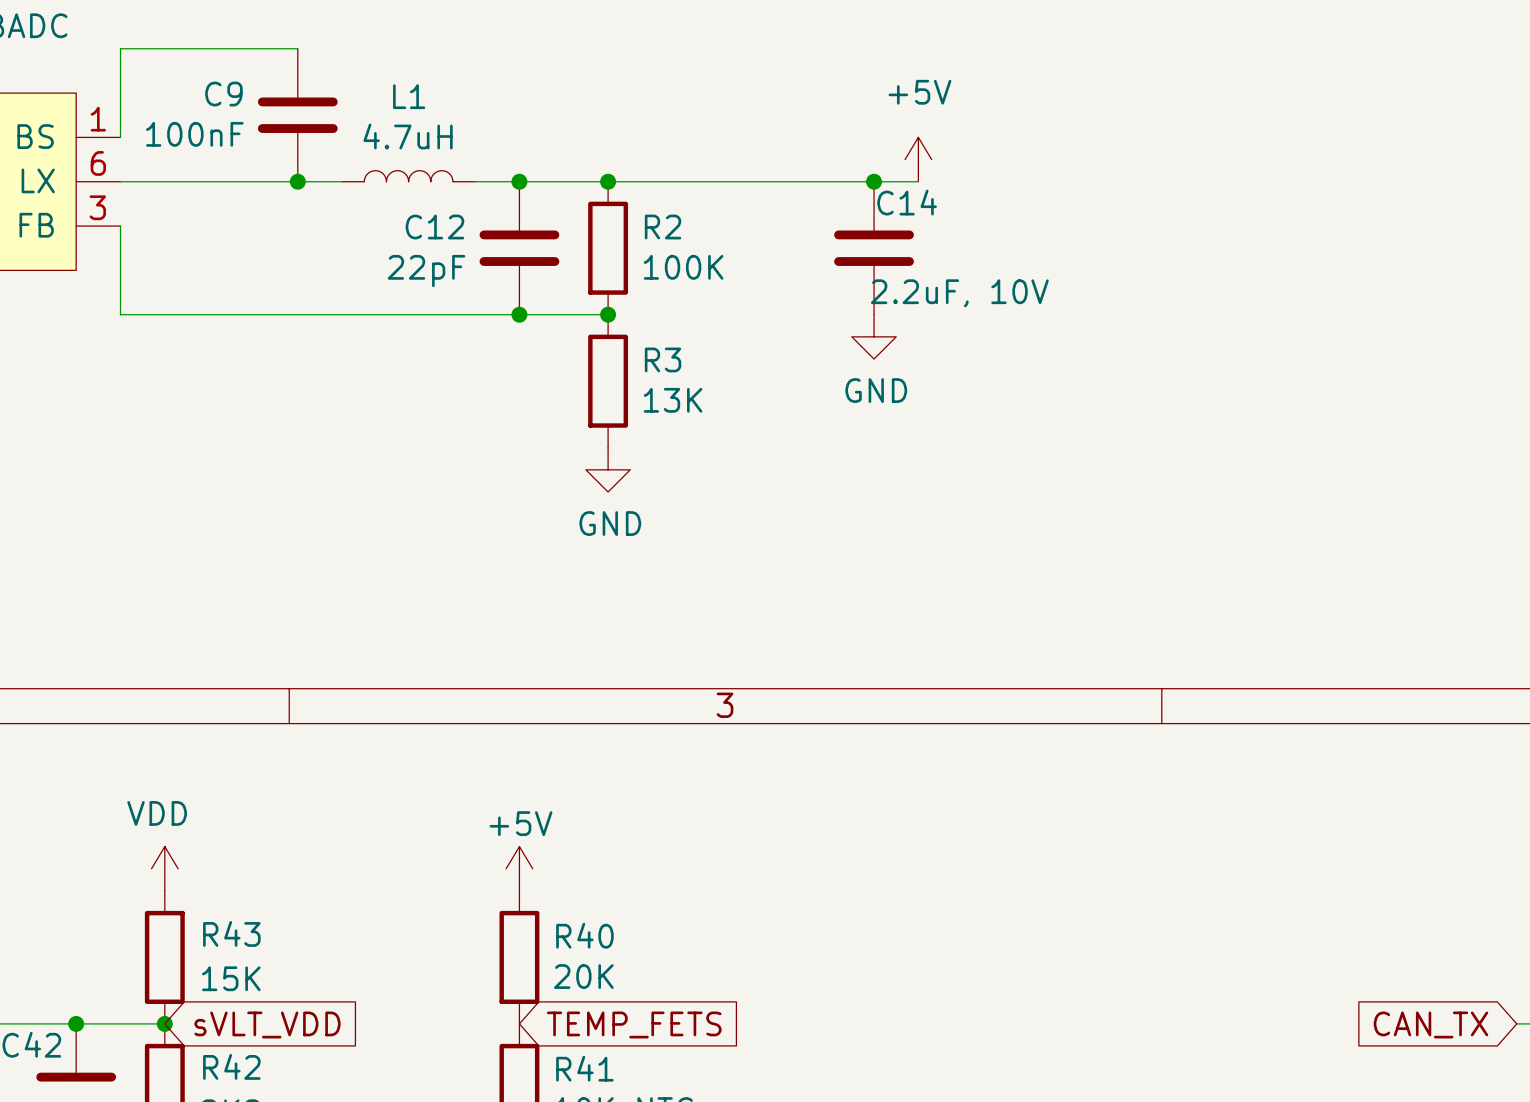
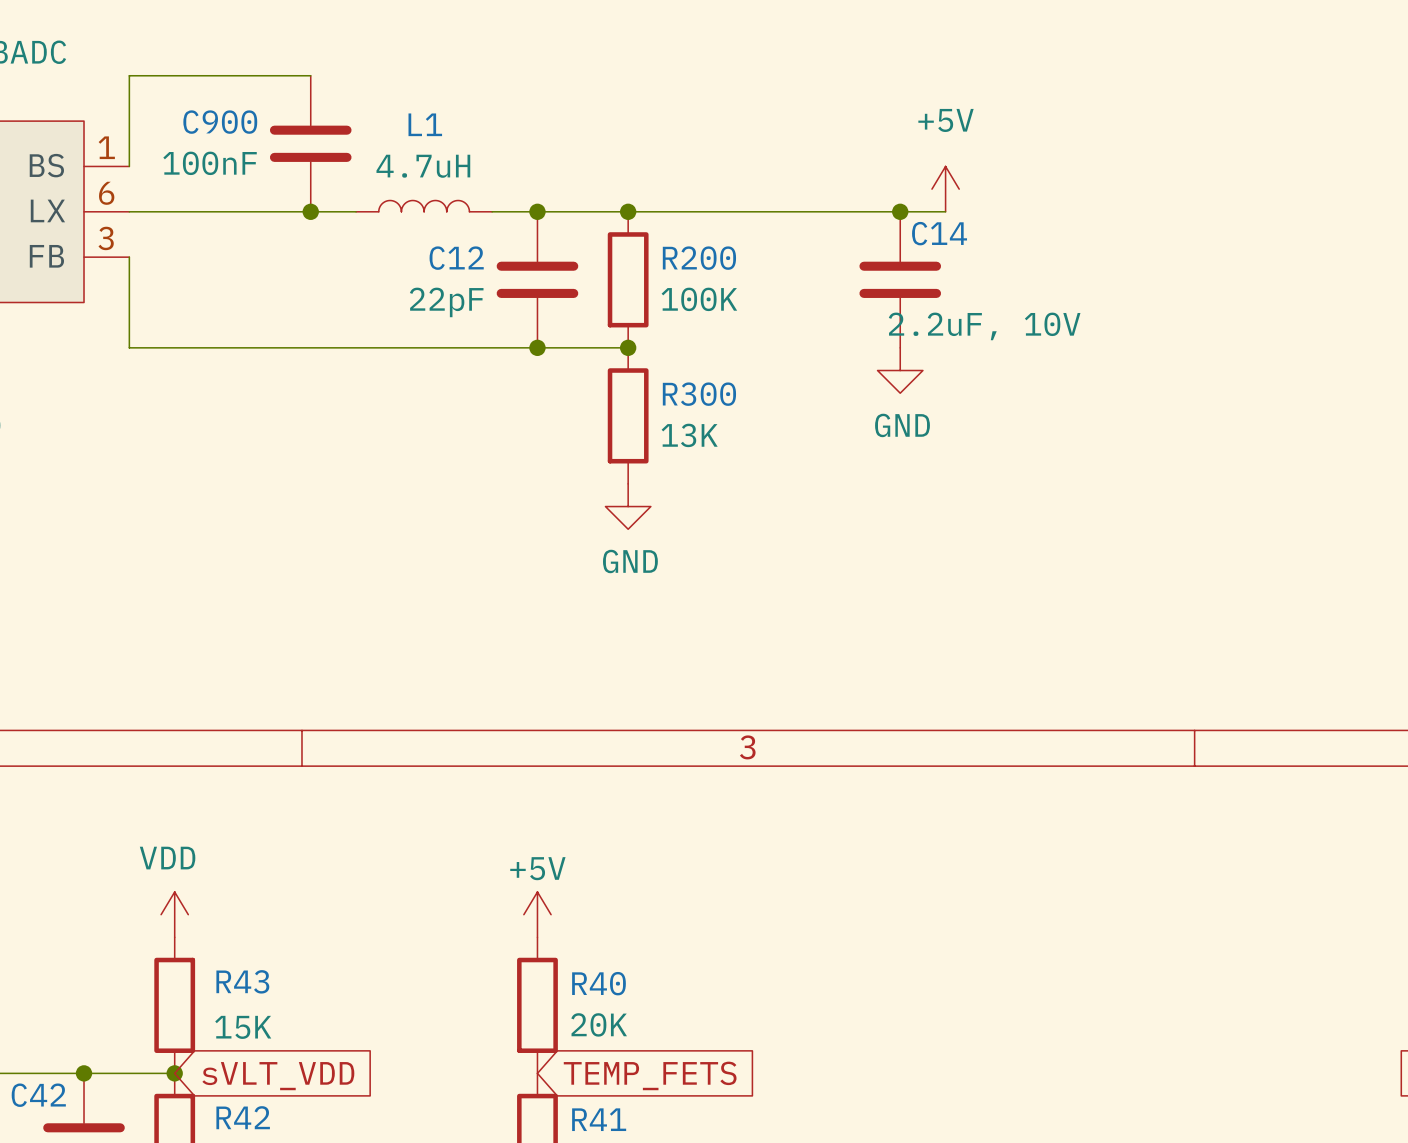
C9 name: C9 (223, 94) -> C900 (220, 122)
R2 name: R2 (663, 227) -> R200 (699, 258)
R3 name: R3 (663, 359) -> R300 (699, 394)

